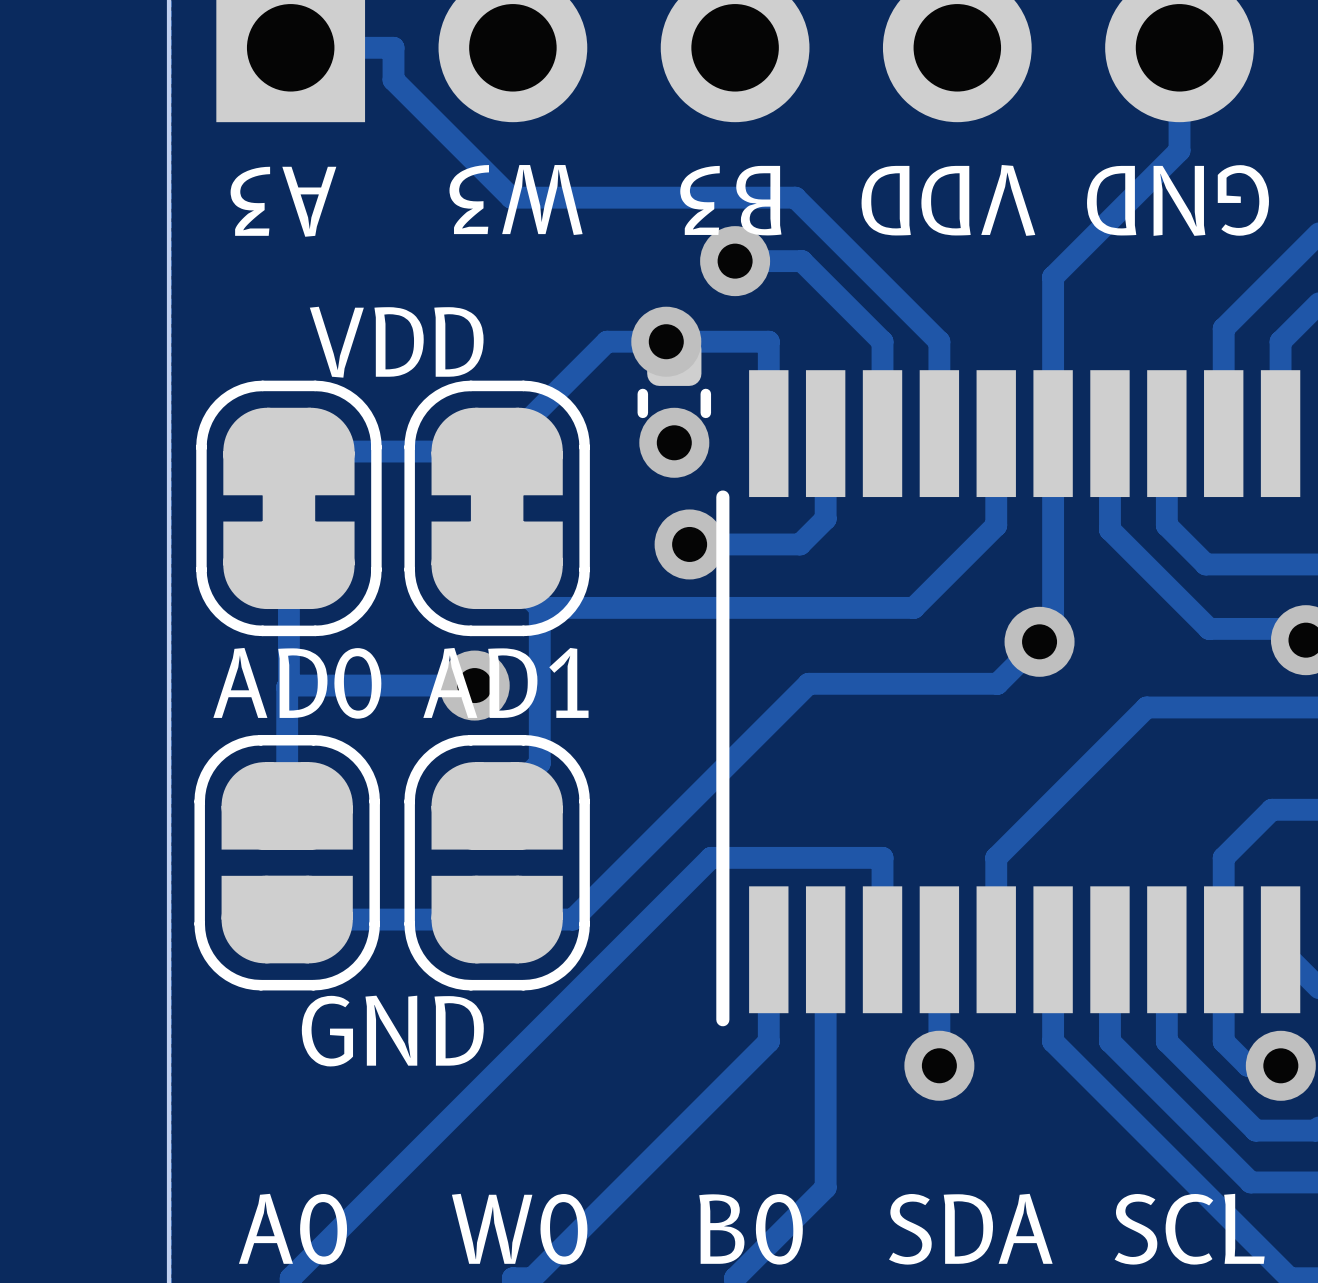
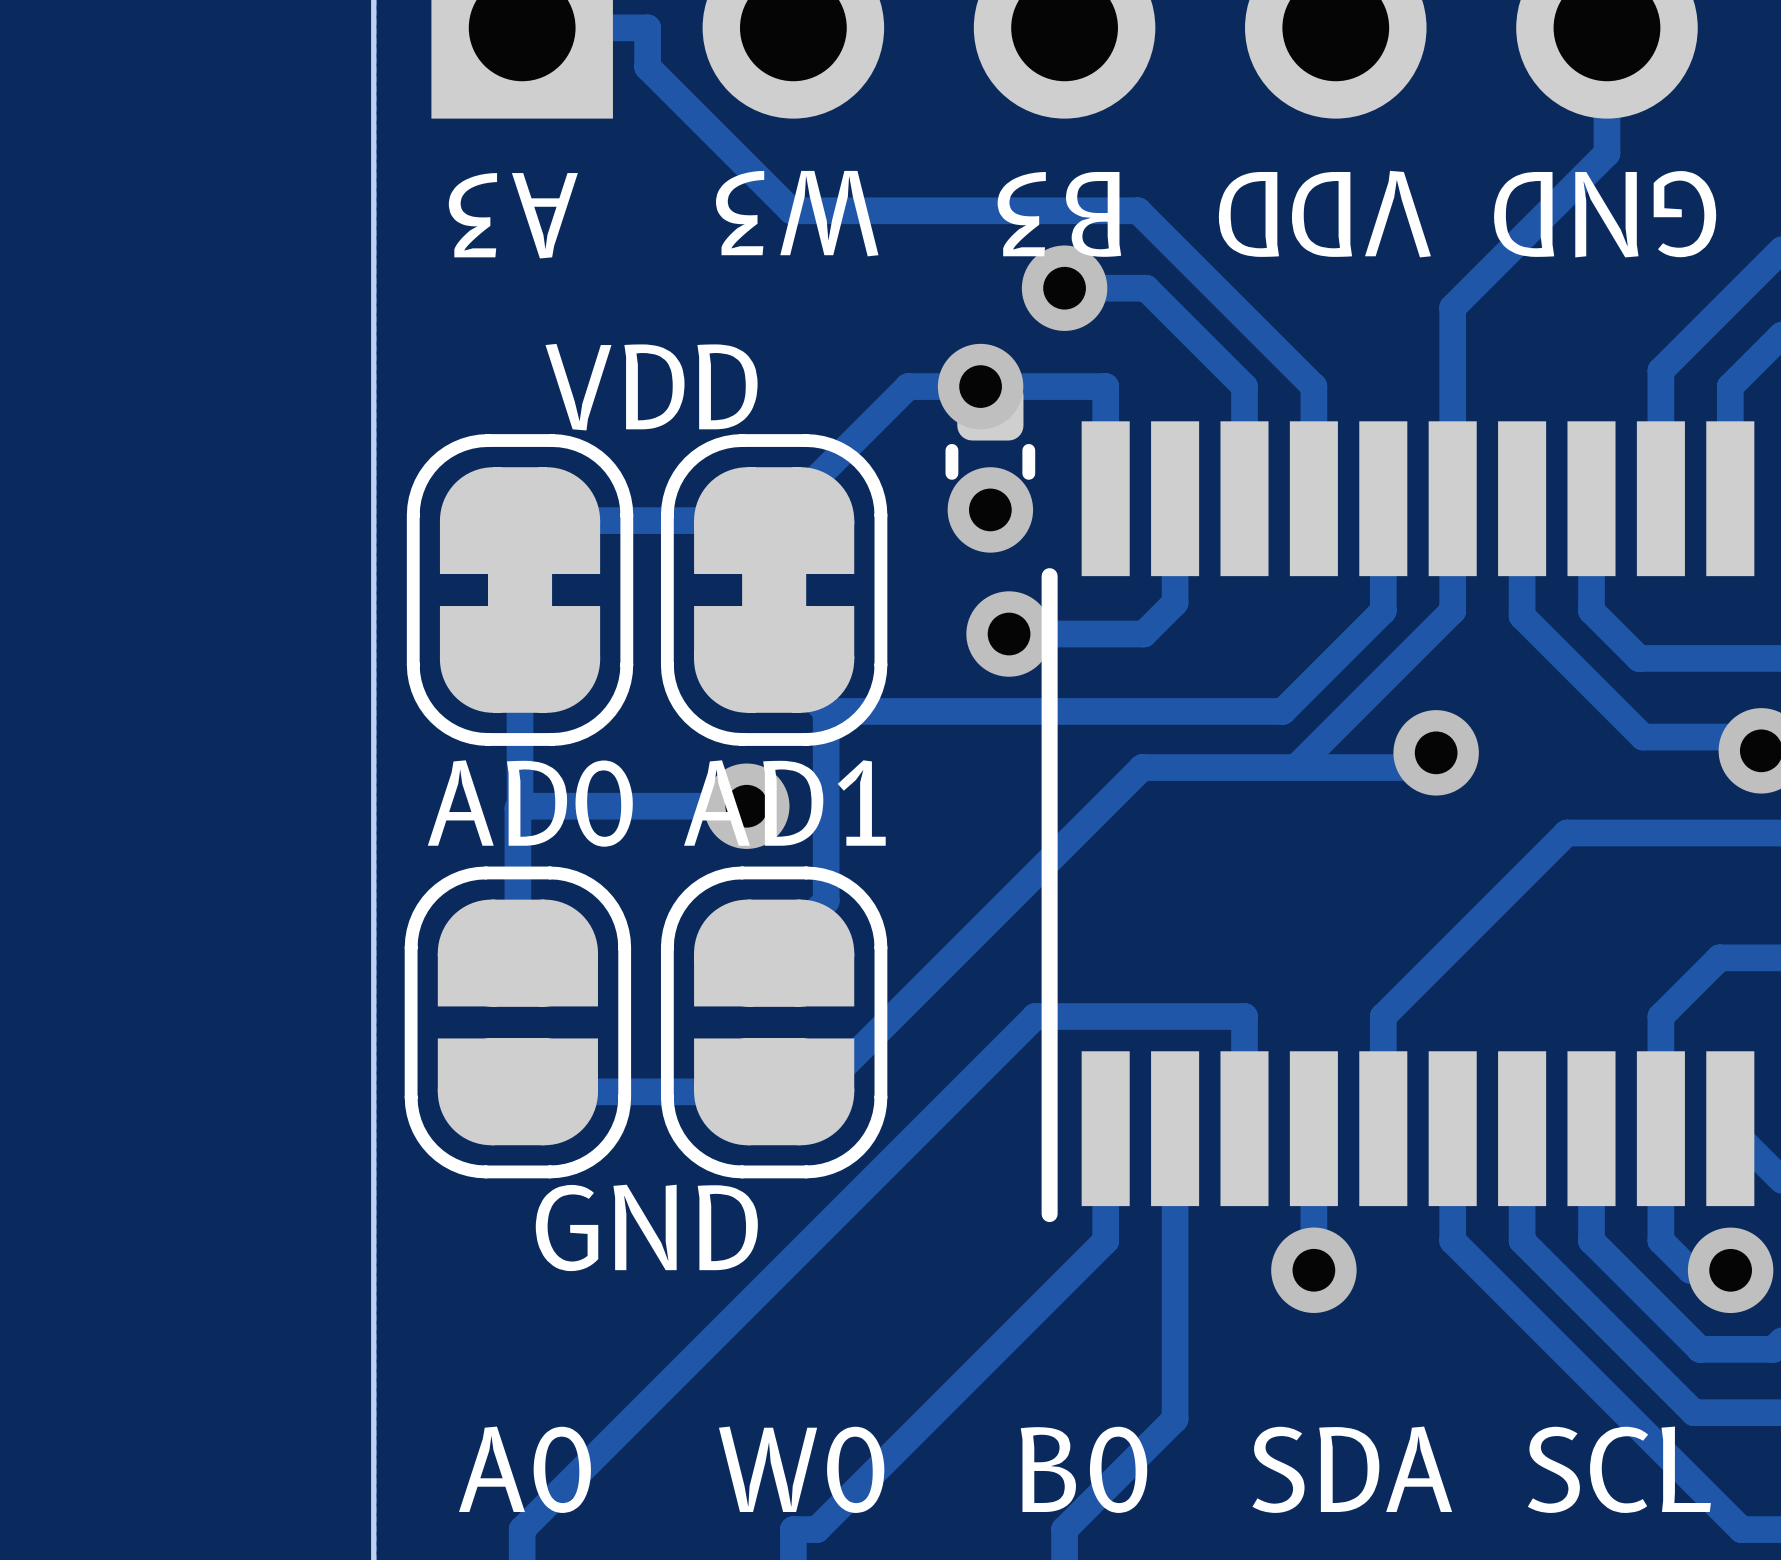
track: (1053, 525) (1053, 628) (1039, 641) -> (1452, 610) (1295, 767)
track: (1027, 653) (997, 683) (808, 683) (572, 919) (533, 919) -> (1421, 767) (1142, 767) (817, 1091)

